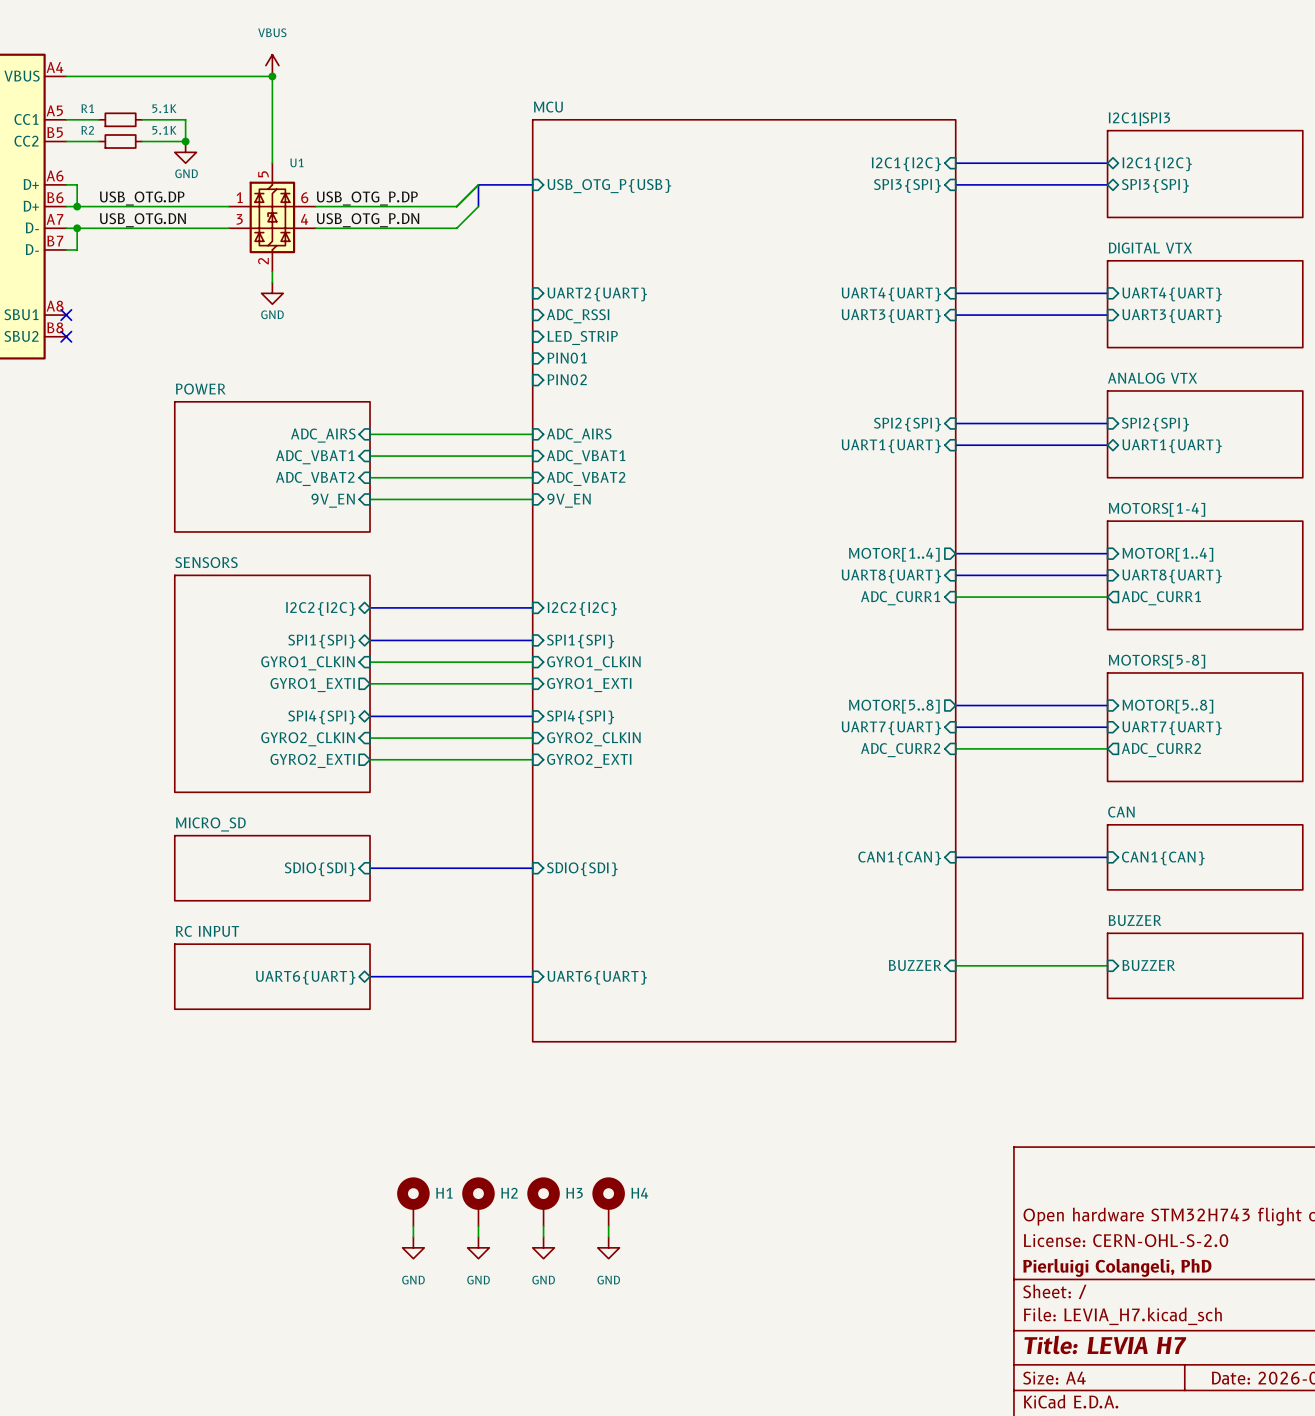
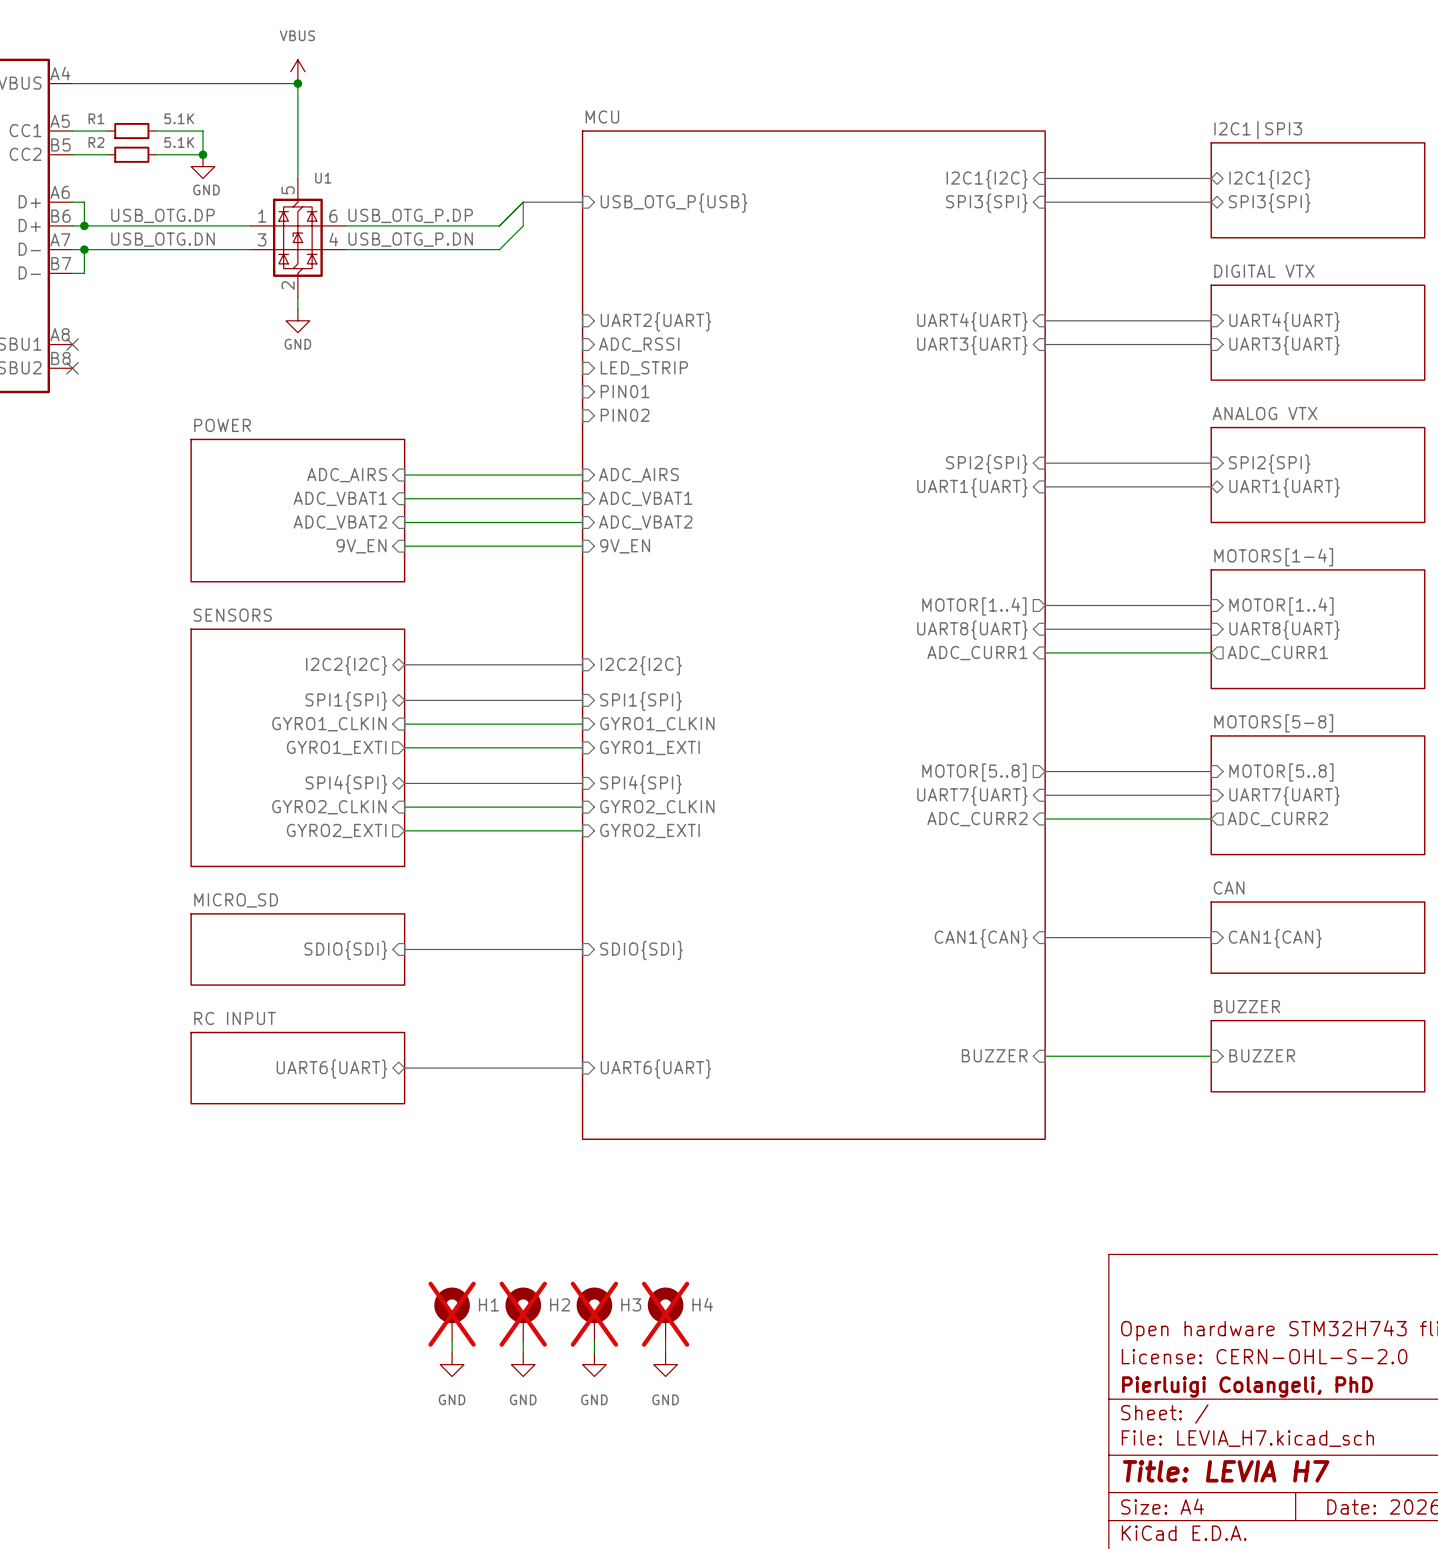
H1 do-not-place cross: none -> (452, 1314)
H2 do-not-place cross: none -> (523, 1314)
H3 do-not-place cross: none -> (594, 1314)
H4 do-not-place cross: none -> (665, 1314)

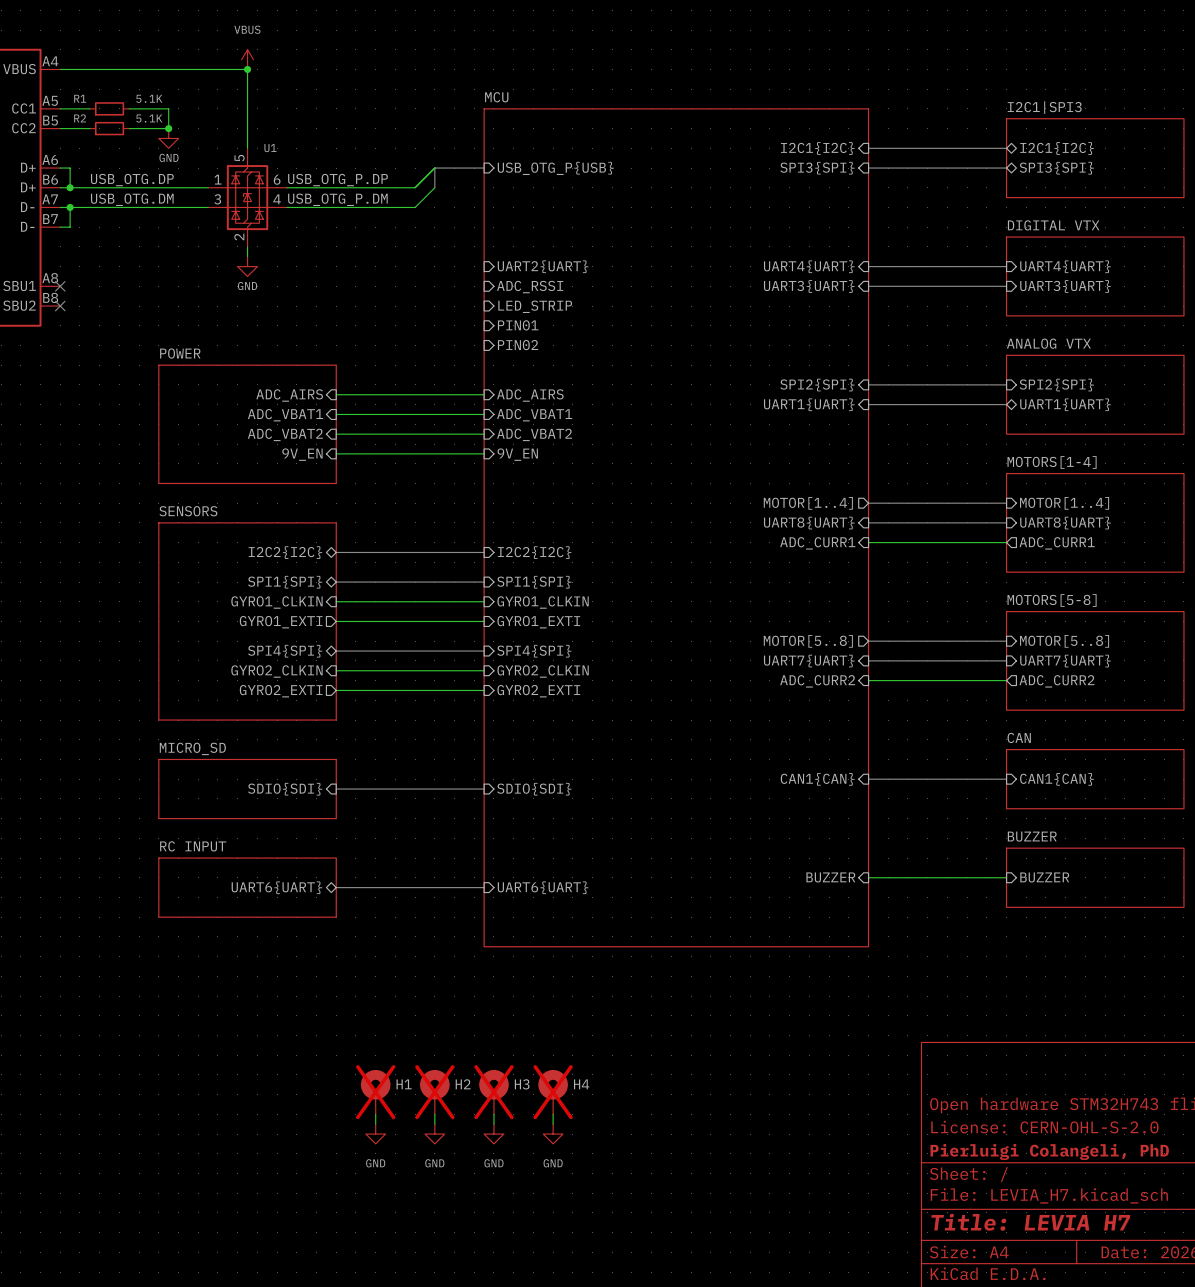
label: USB_OTG.DN (162, 239) -> USB_OTG.DM (132, 199)
label: USB_OTG_P.DN (410, 239) -> USB_OTG_P.DM (337, 199)

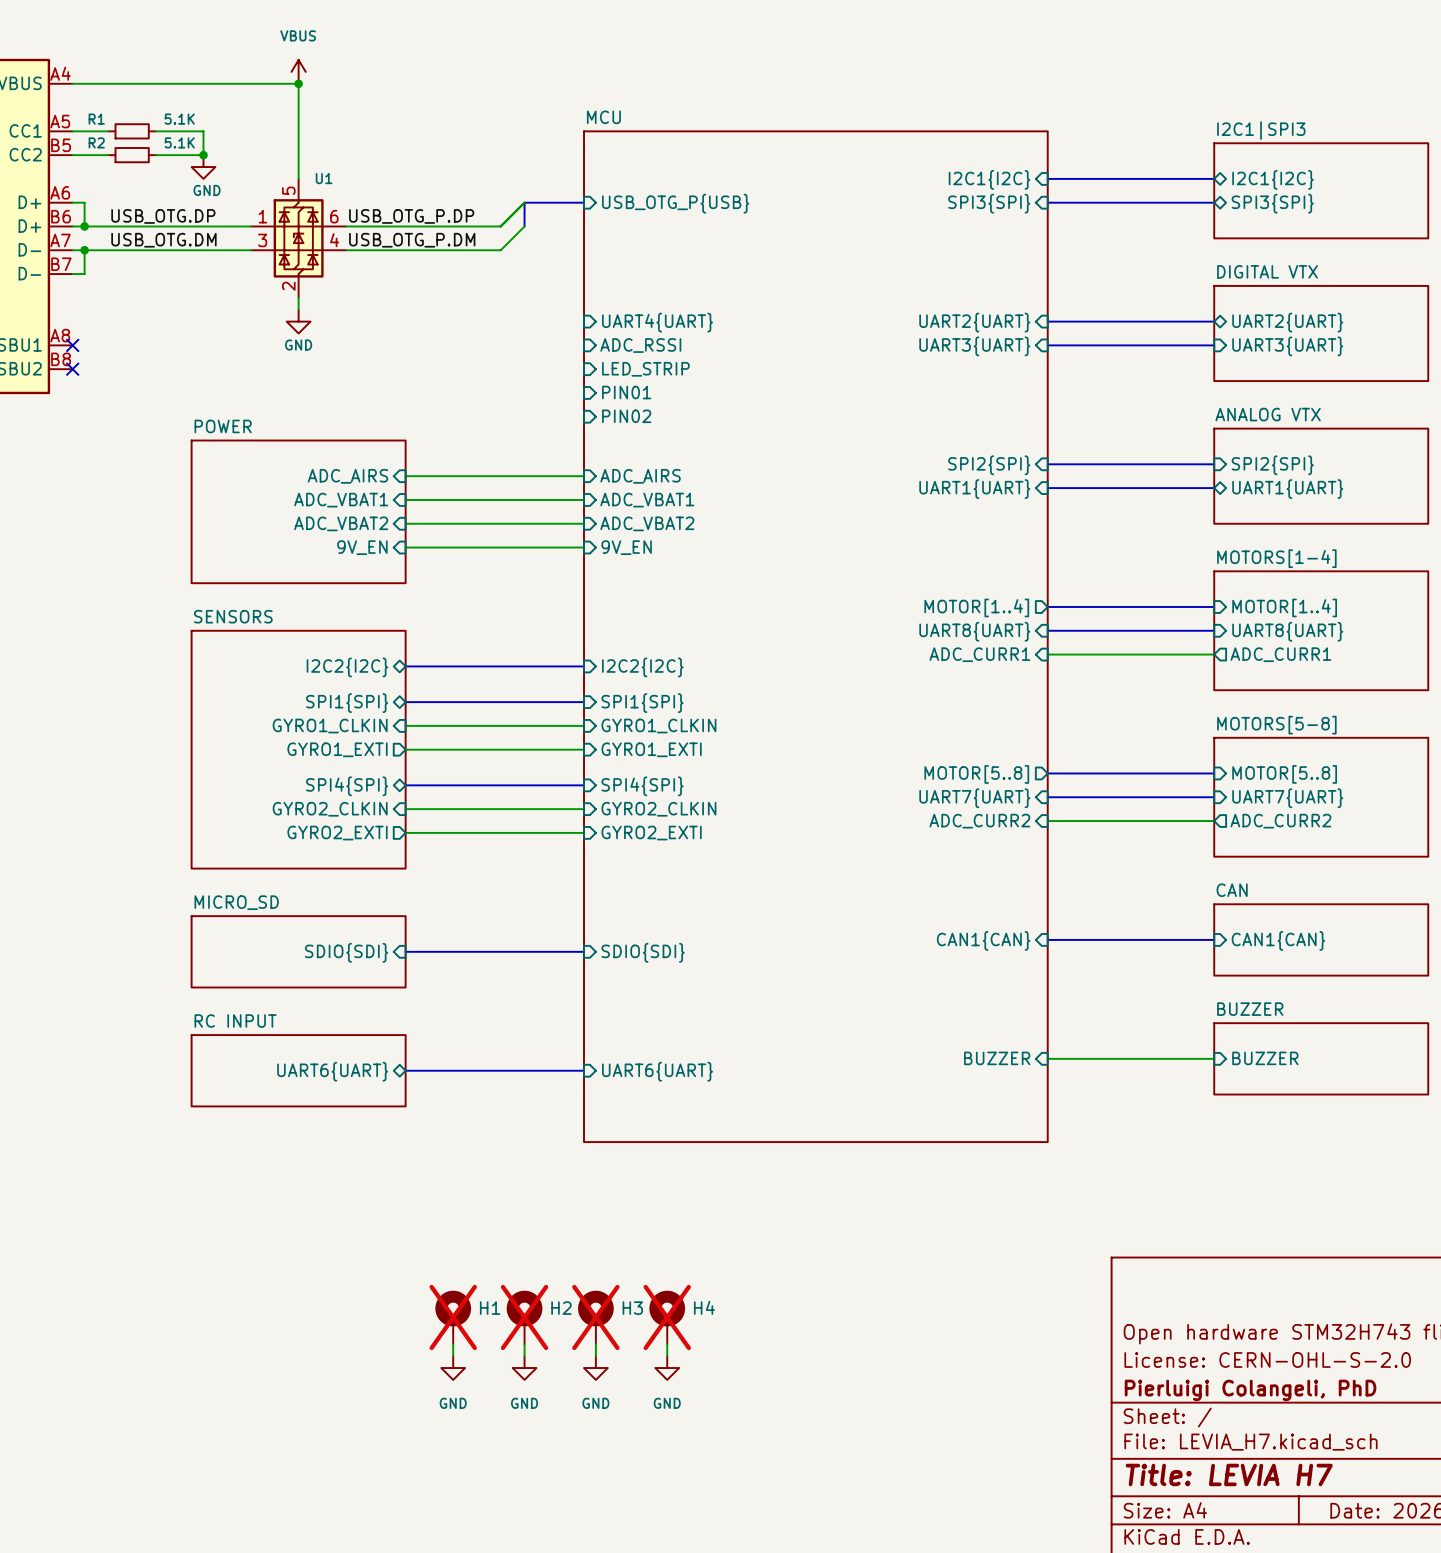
sheet pin: UART2{UART} (543, 266) -> UART4{UART} (657, 322)
sheet pin: UART4{UART} (809, 266) -> UART2{UART} (974, 322)
sheet pin shape: input (1065, 266) -> bidirectional (1287, 322)
sheet pin: UART4{UART} (1065, 266) -> UART2{UART} (1287, 322)

